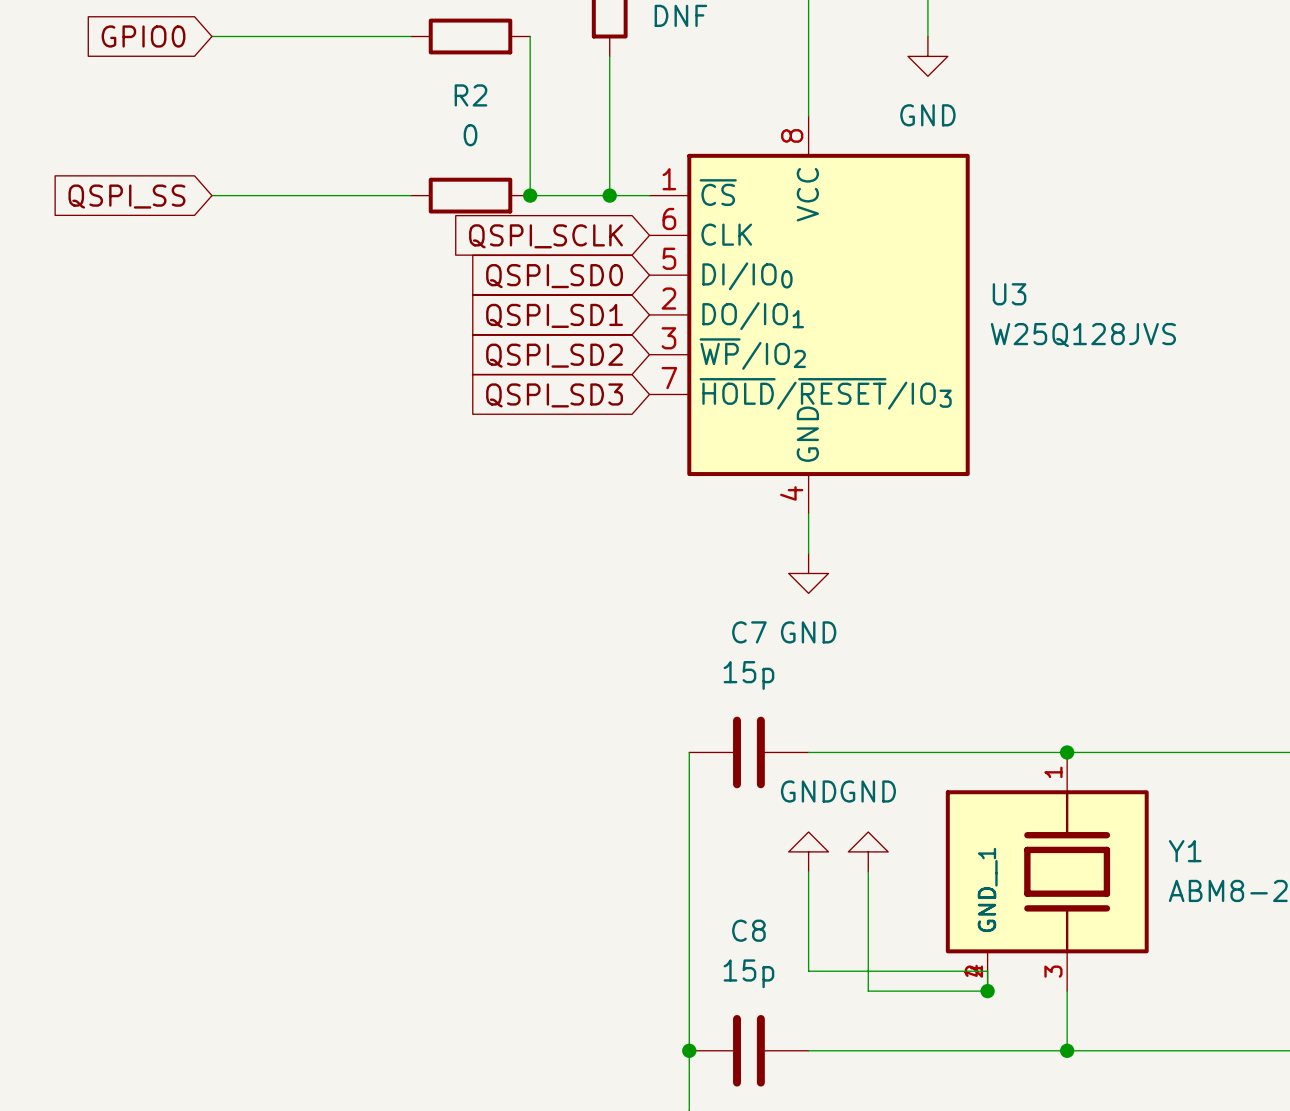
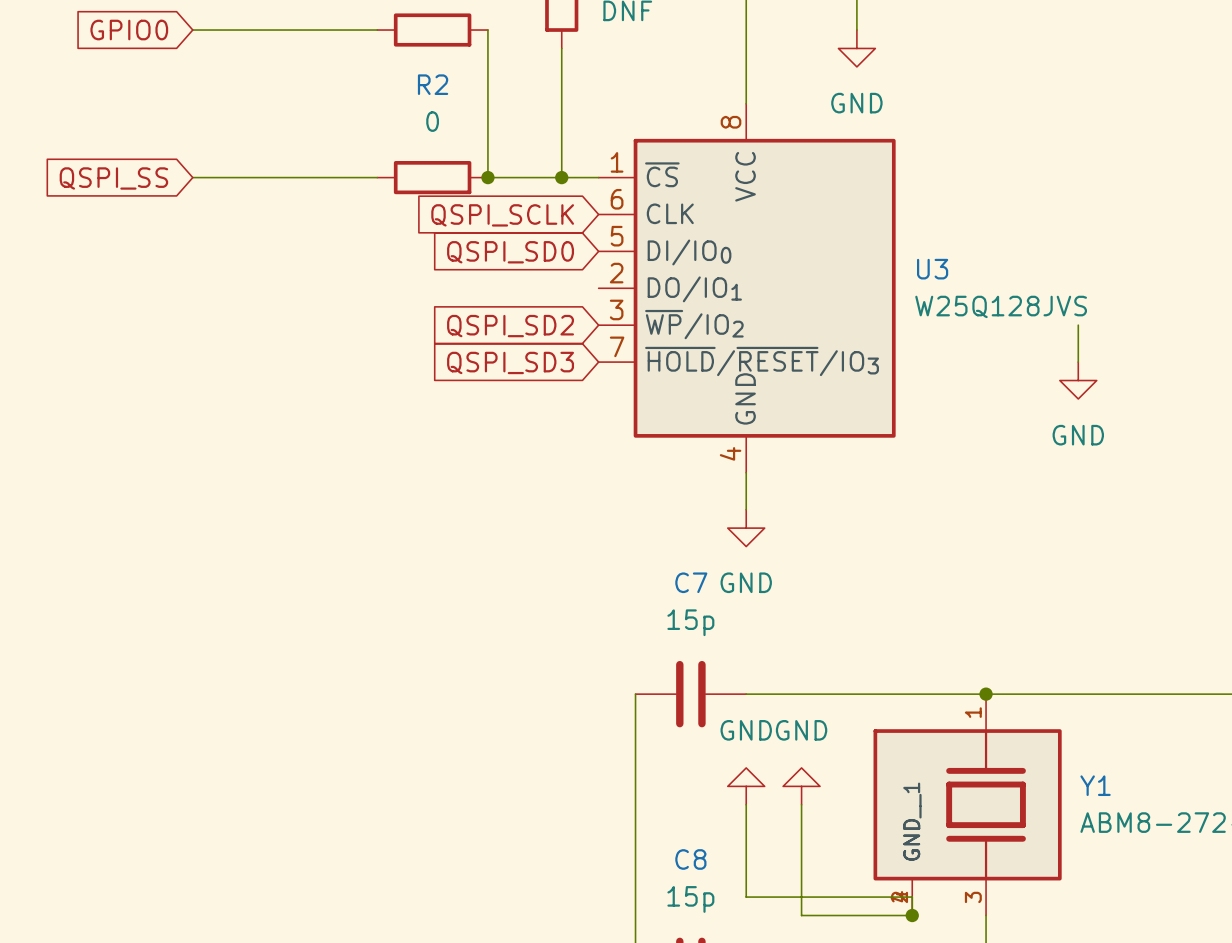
global label: QSPI_SD1 (554, 315) -> none
wire: none -> (1078, 325) (1078, 362)
power symbol: none -> GND (1078, 380)

